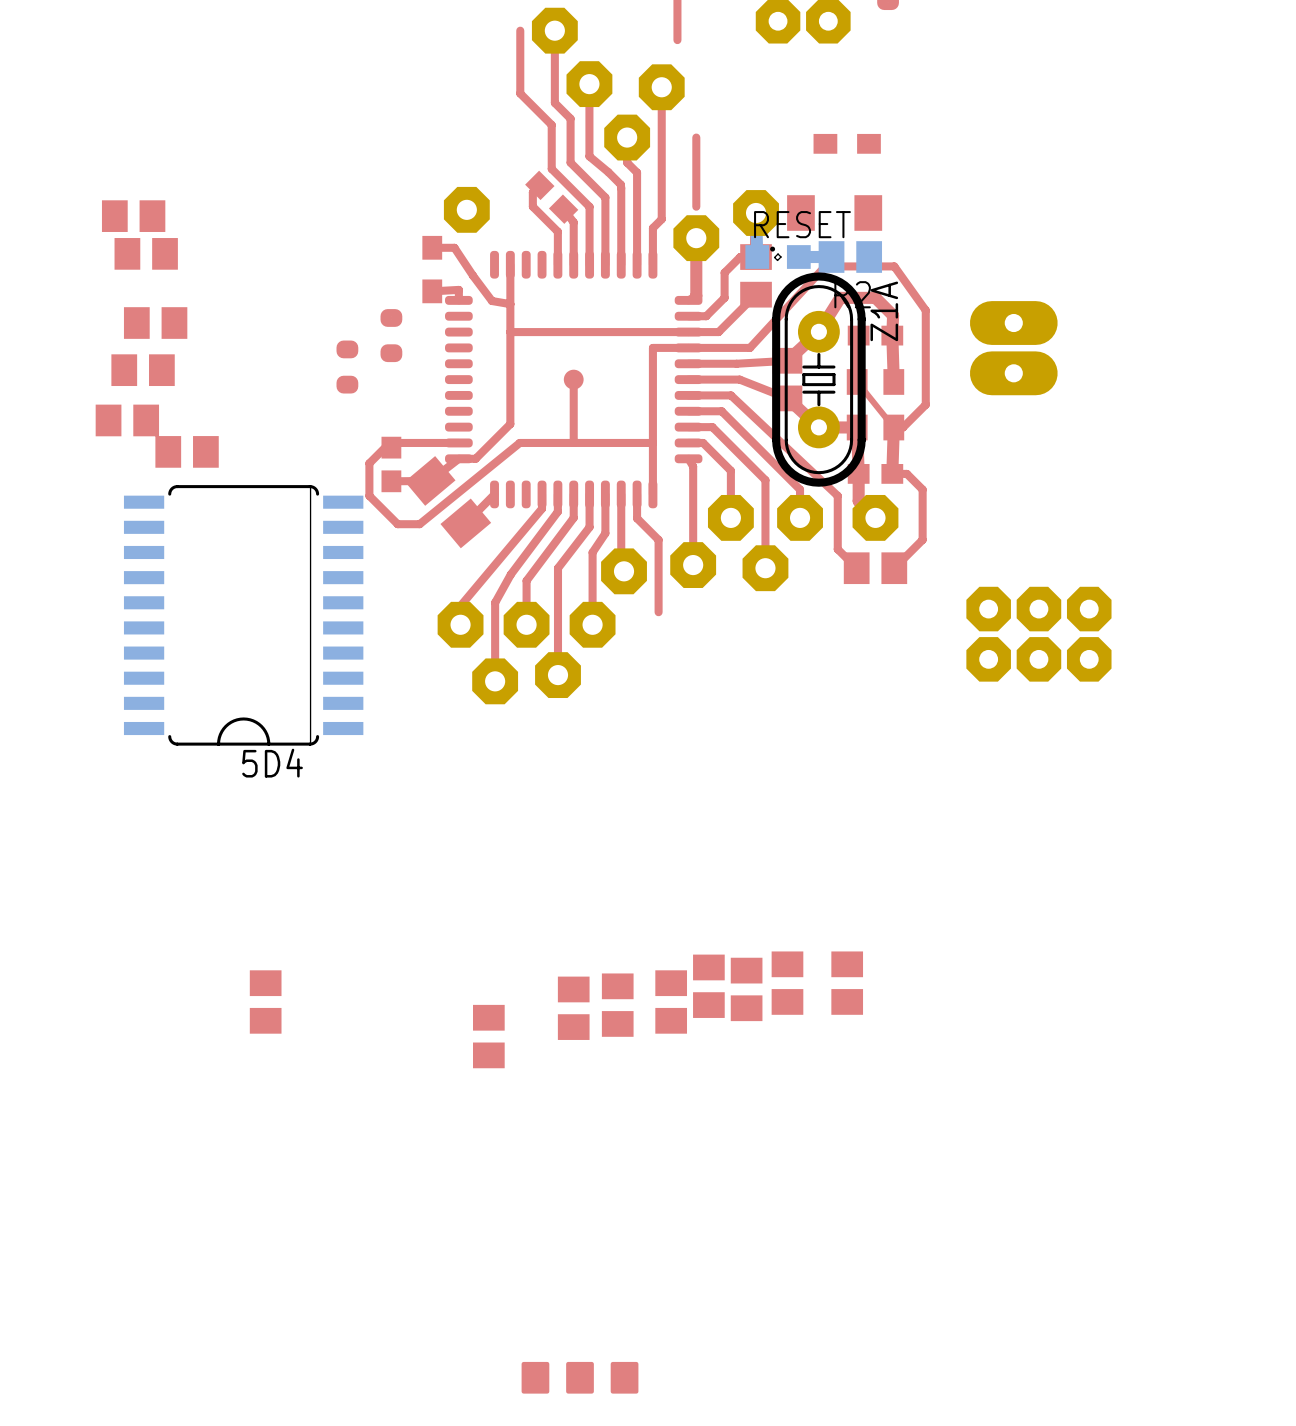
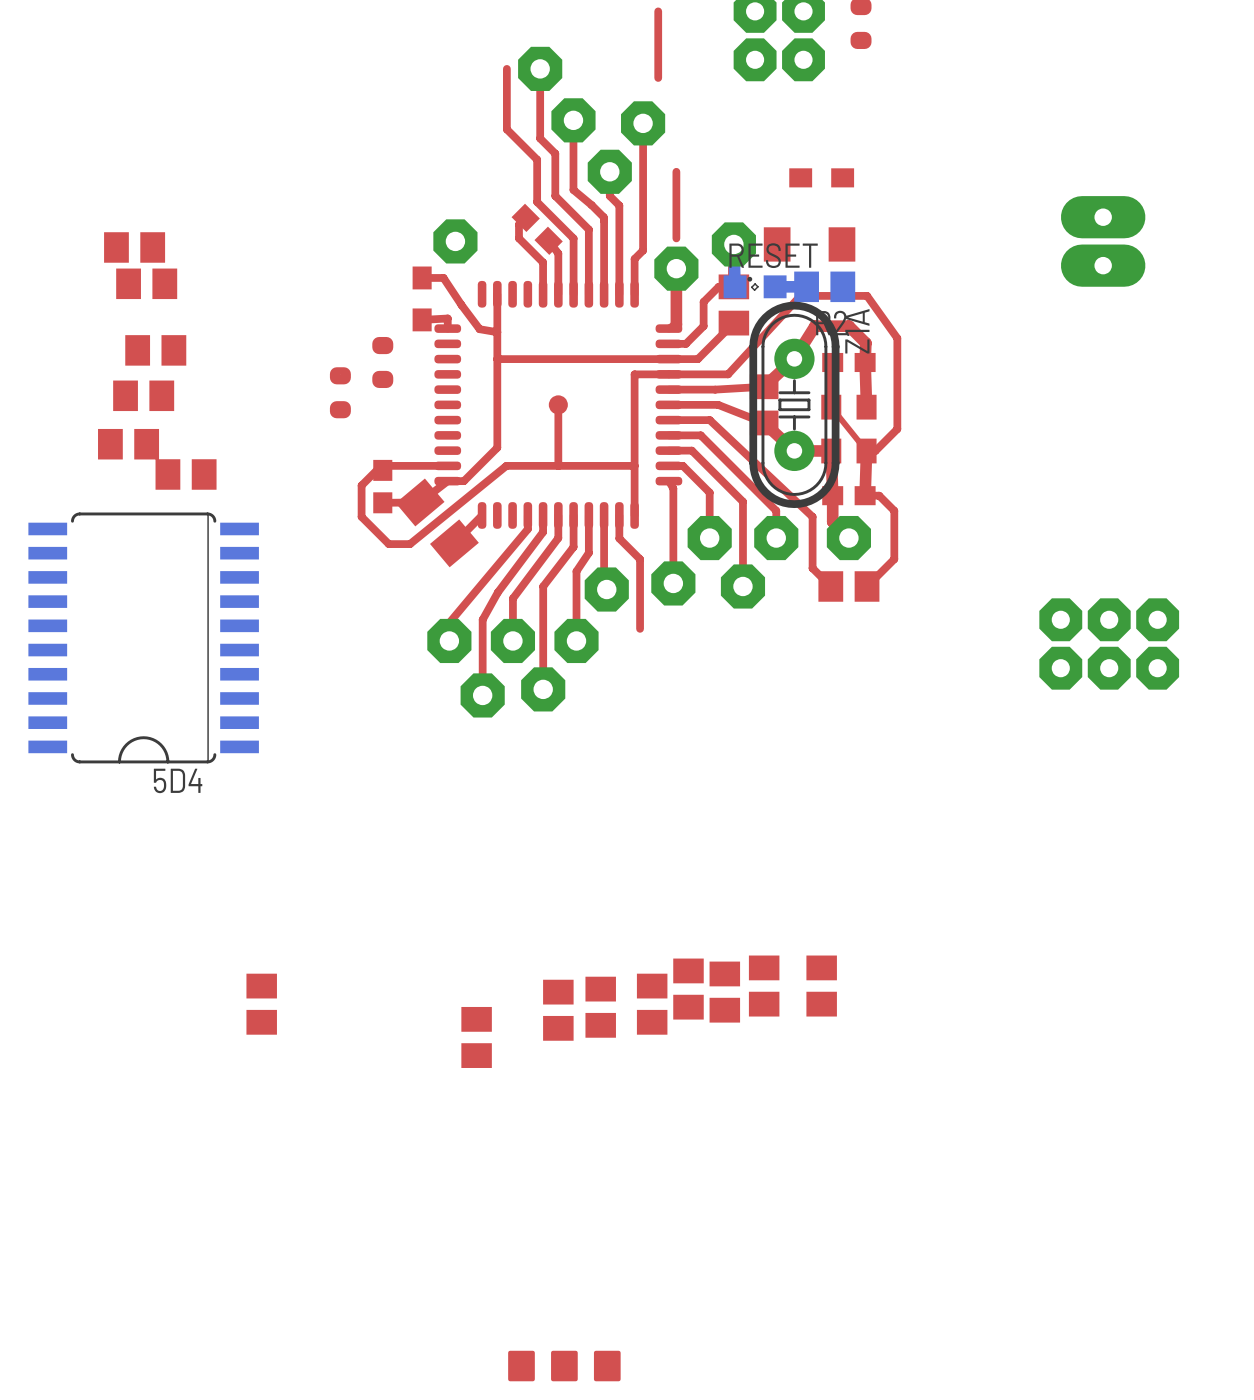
part position: (1013, 348) -> (1103, 241)
5D4 position: (243, 615) -> (143, 637)
part position: (1038, 634) -> (1109, 643)

